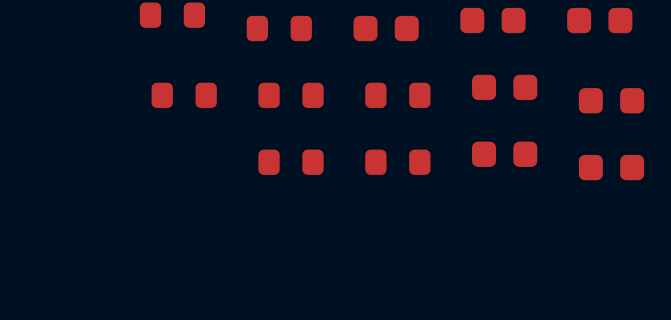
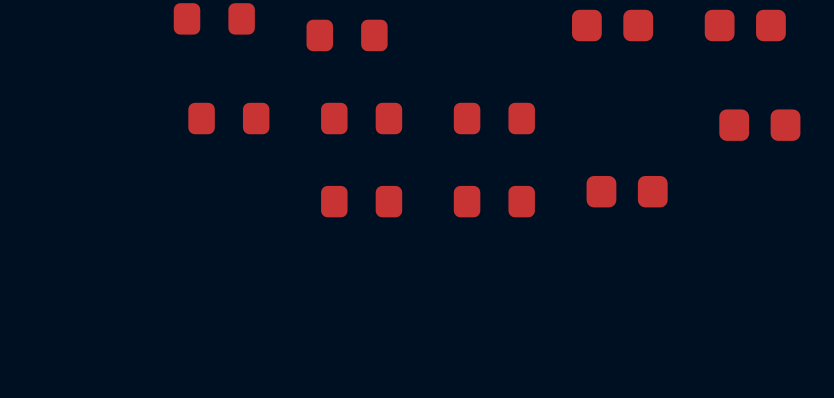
part: (386, 28) -> none
part: (504, 87) -> none
part: (611, 167) -> none

